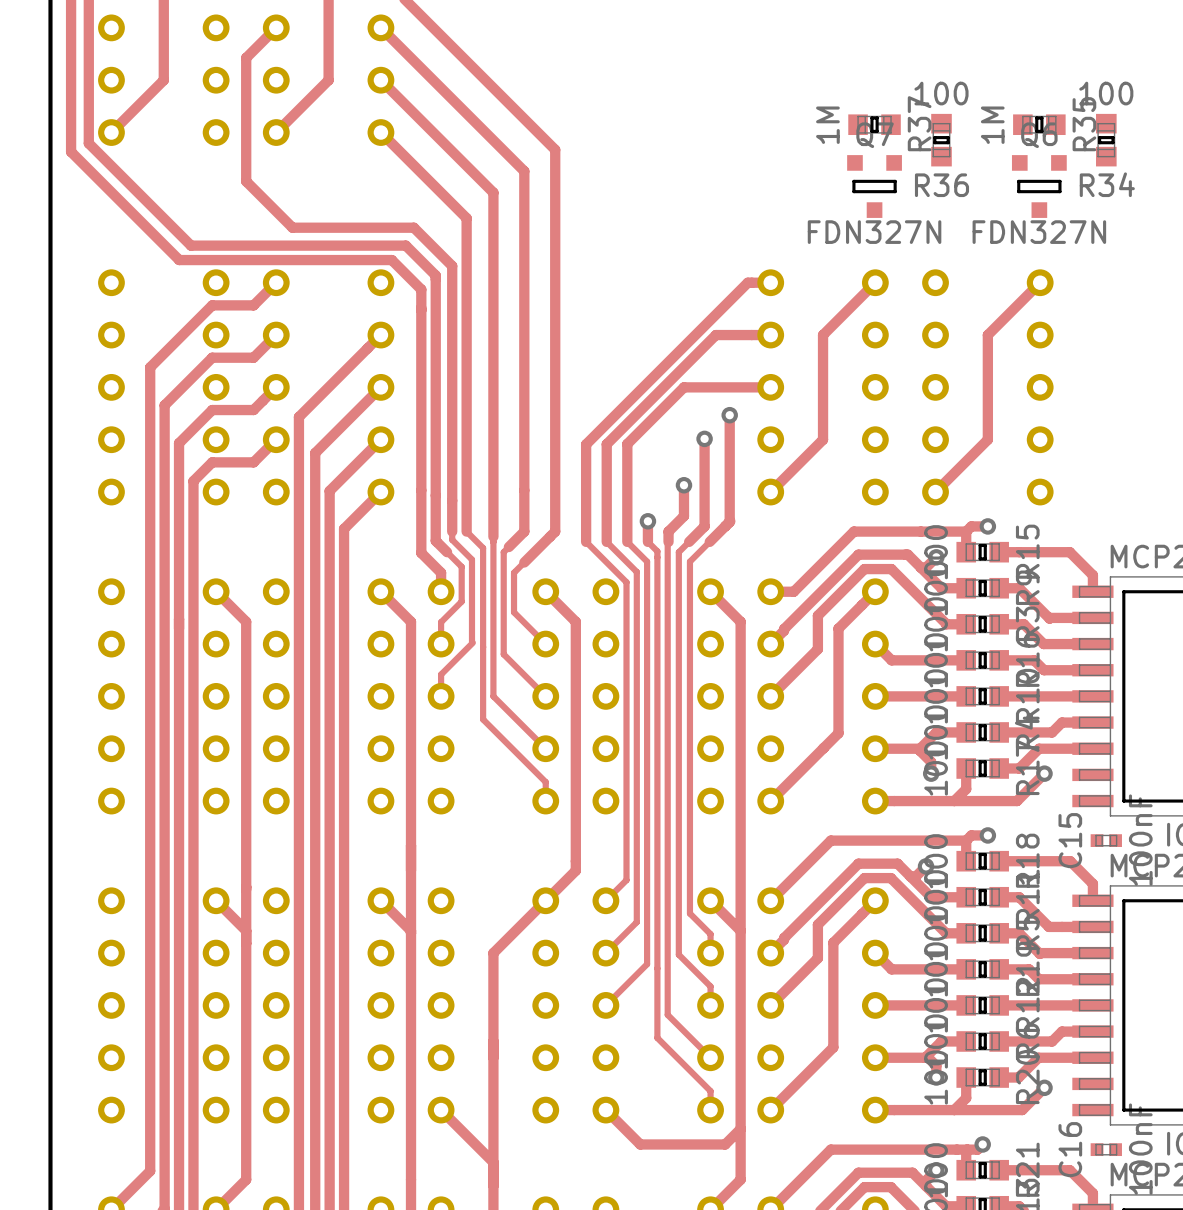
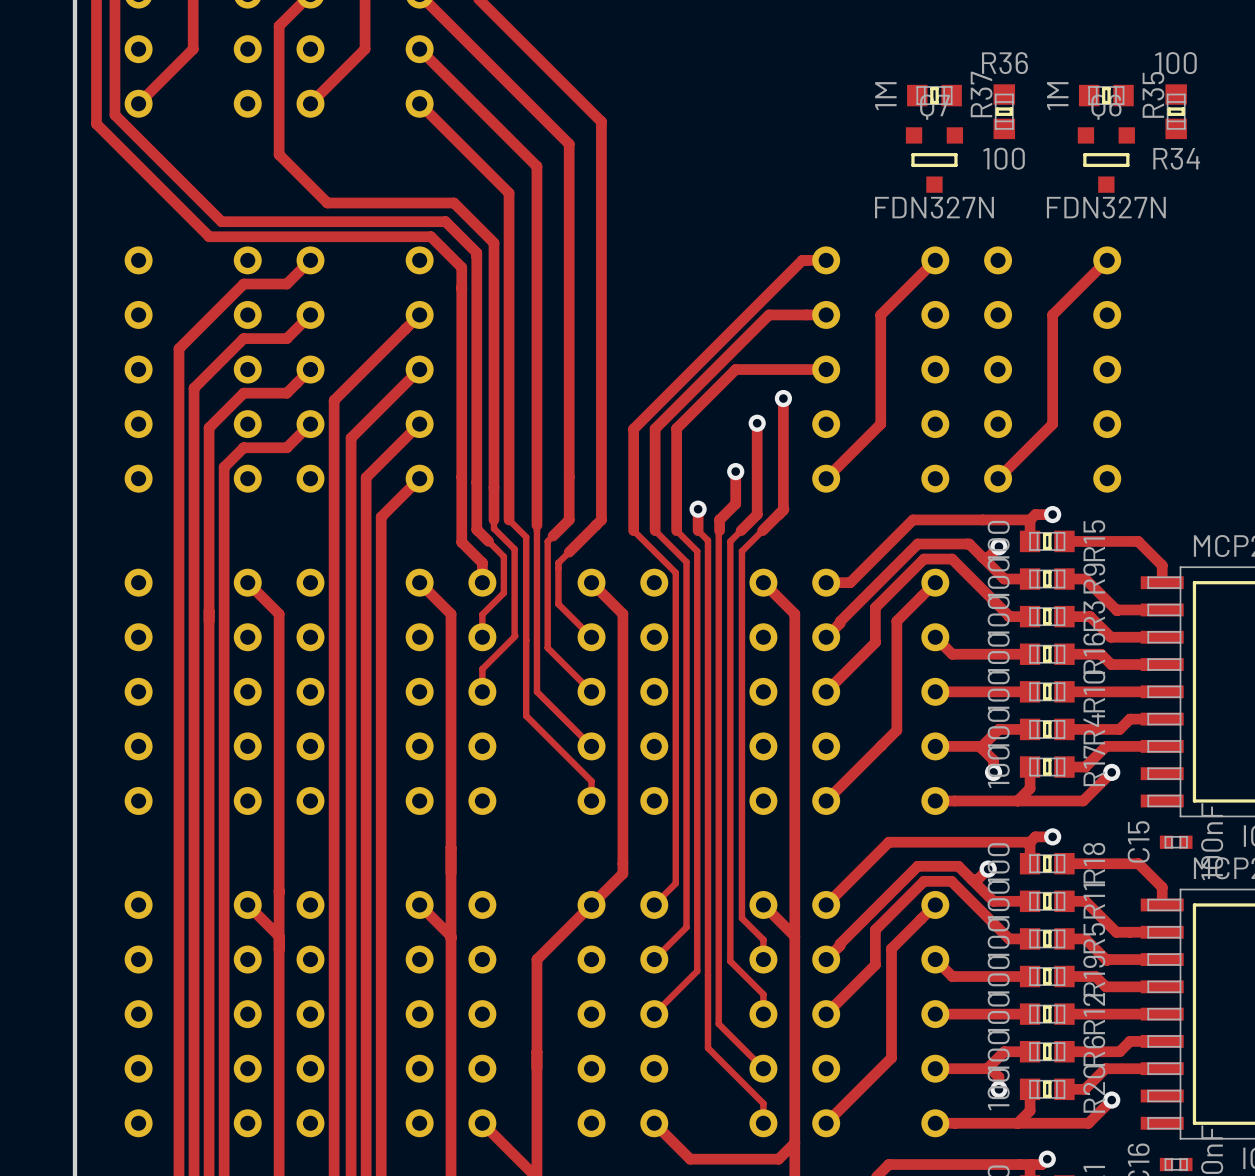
R36 value position: 100 (941, 93) -> 100 (1004, 158)
R36 name position: R36 (941, 185) -> R36 (1004, 63)

